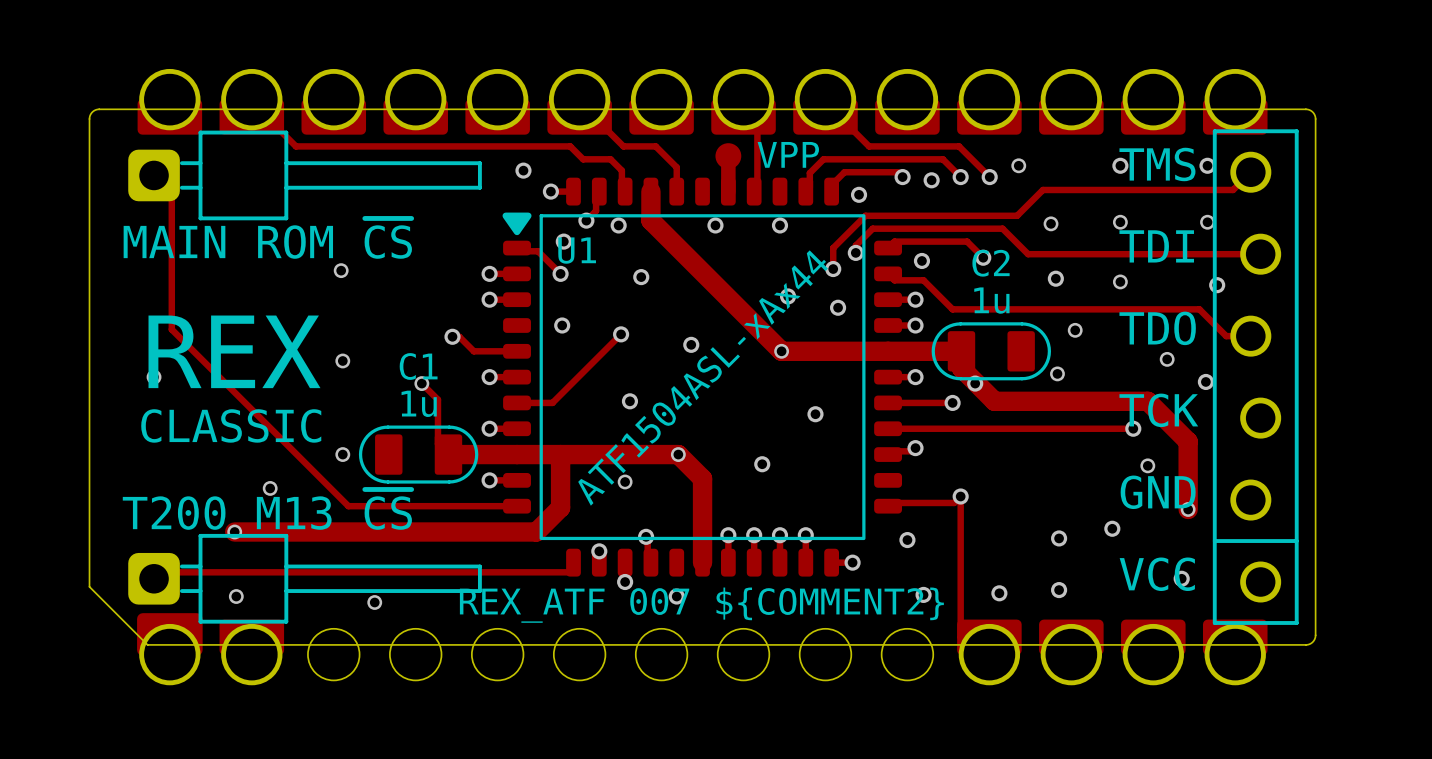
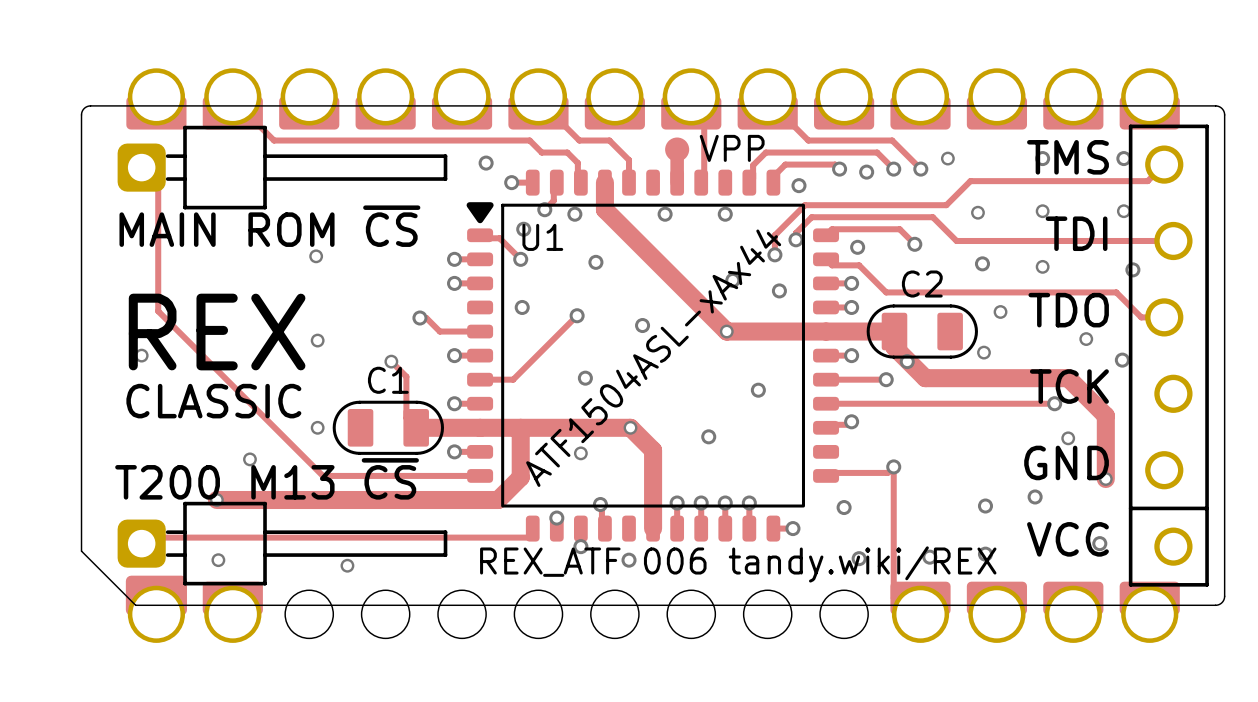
C2 name position: C2 (991, 263) -> C2 (922, 284)
C2 value: 1u (991, 300) -> none
C1 name position: C1 (418, 366) -> C1 (388, 380)
C1 value: 1u (419, 403) -> none
text: none -> REX_ATF 006 tandy.wiki/REX (738, 564)
text: REX_ATF 007 ${COMMENT2} (701, 605) -> none

